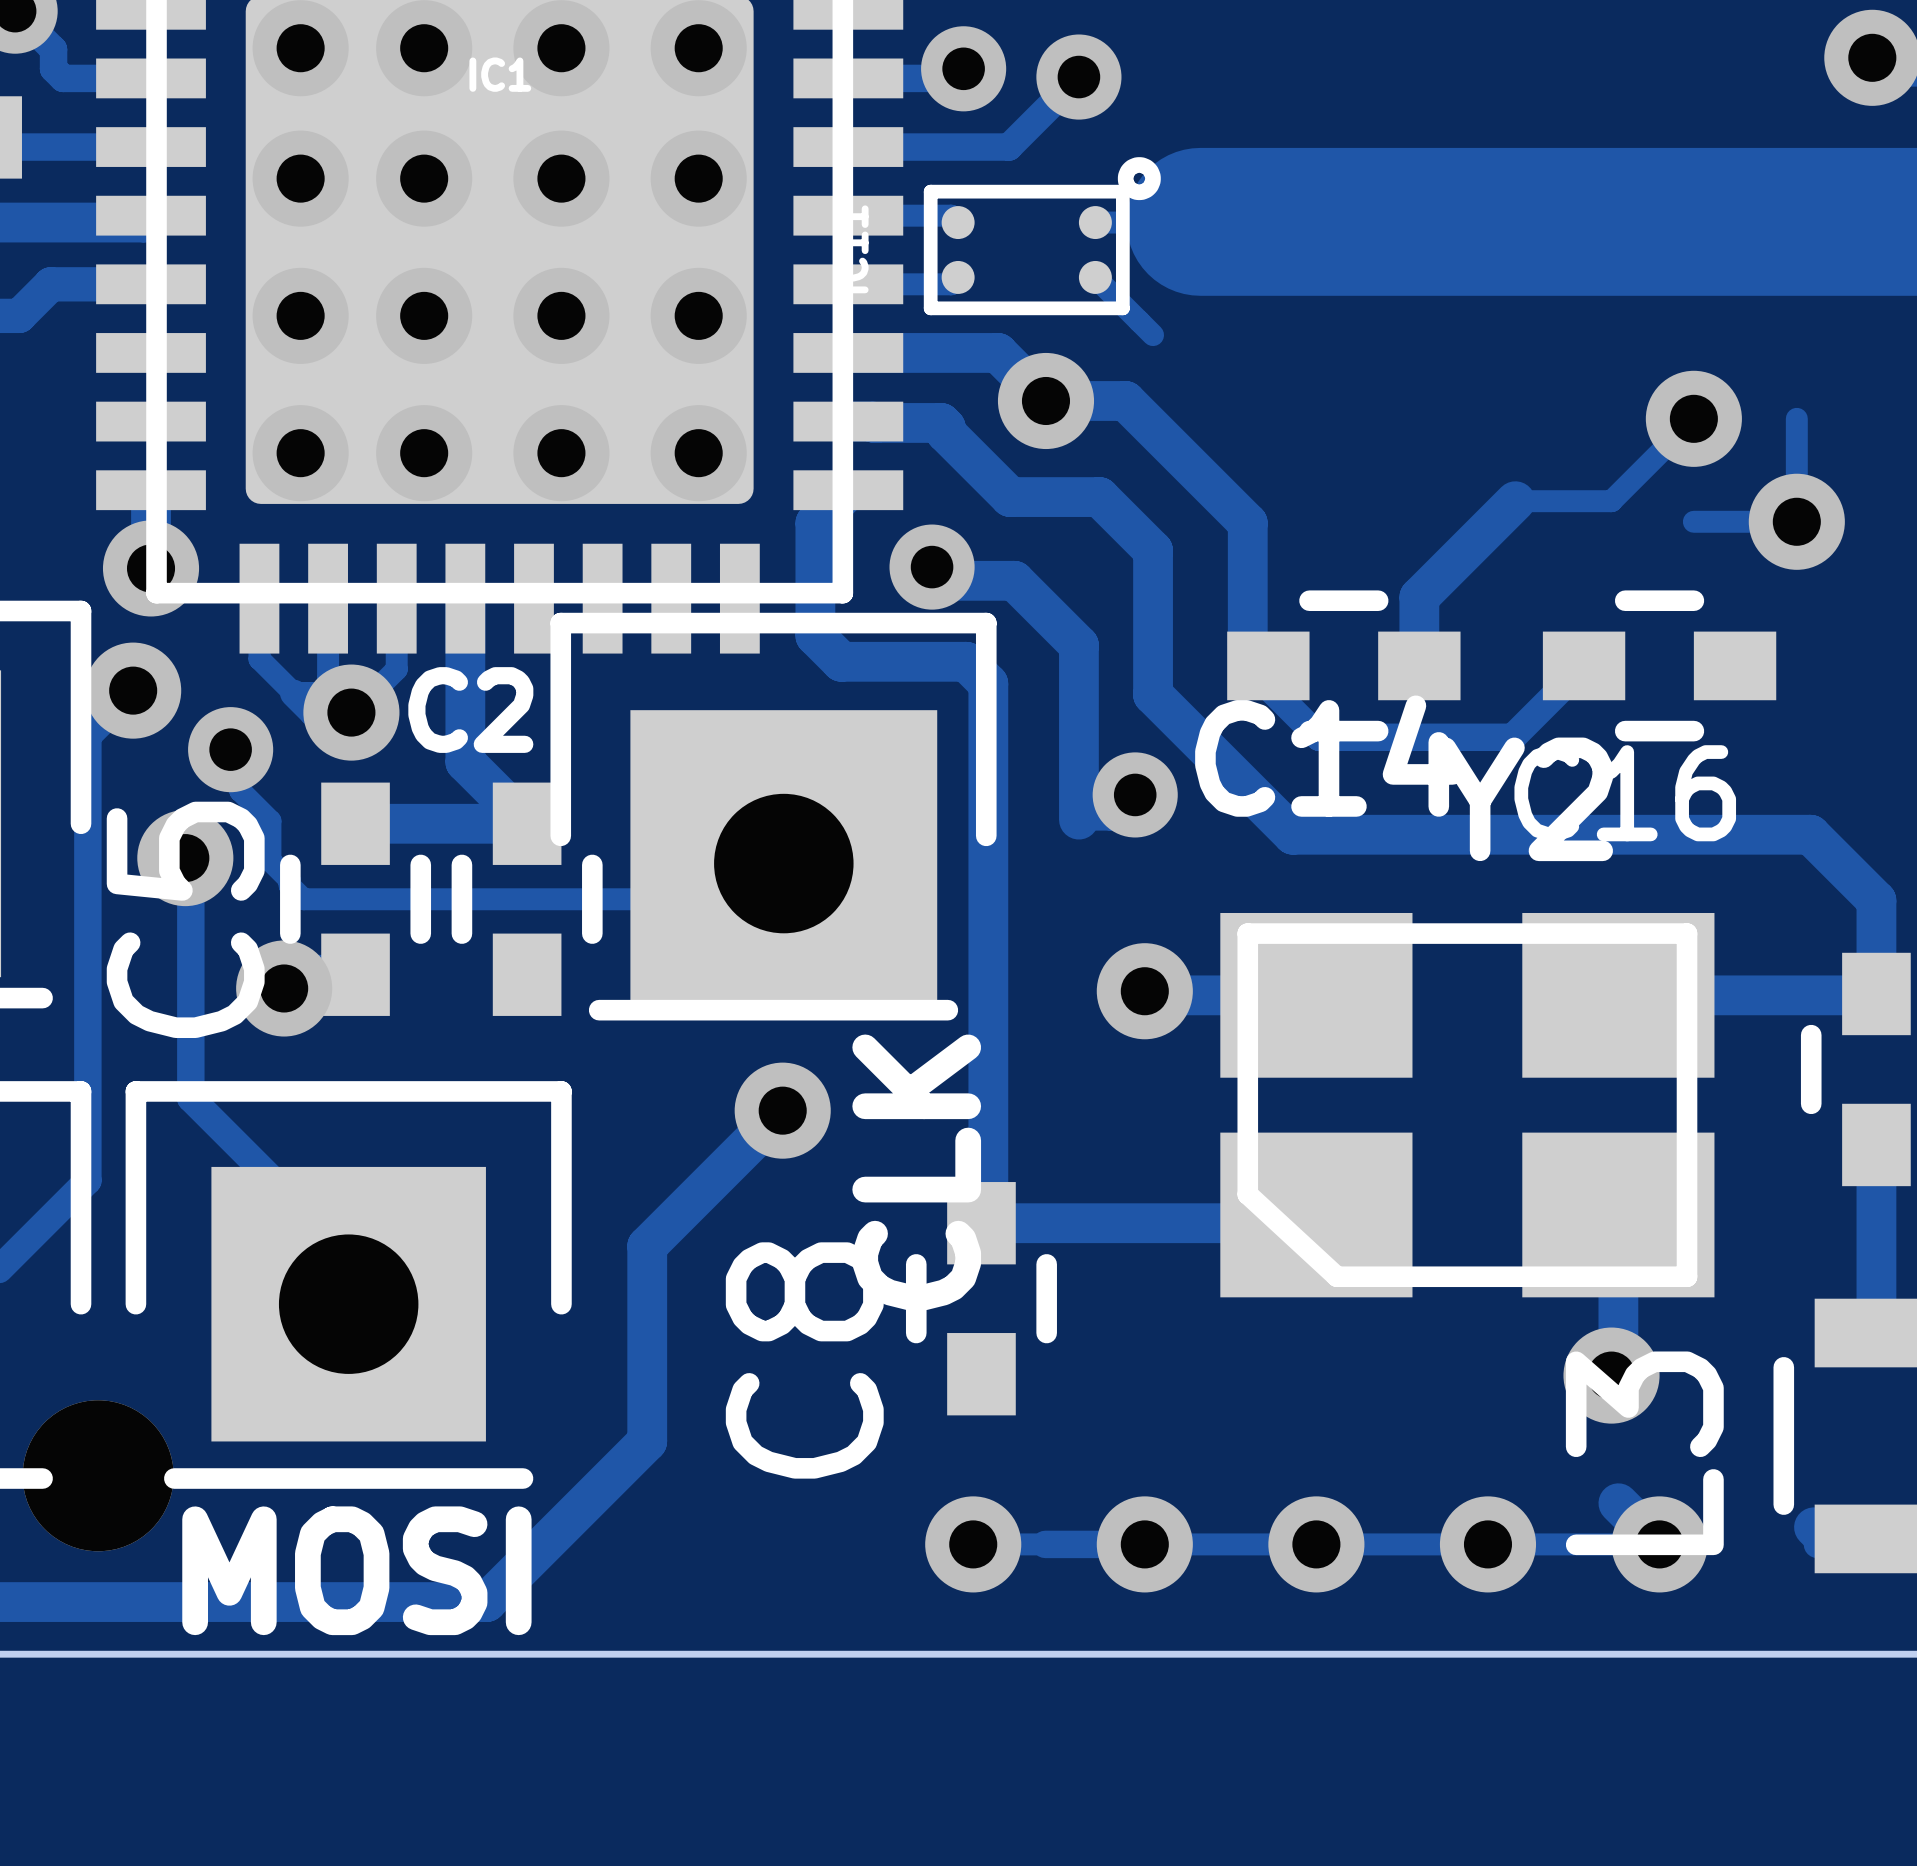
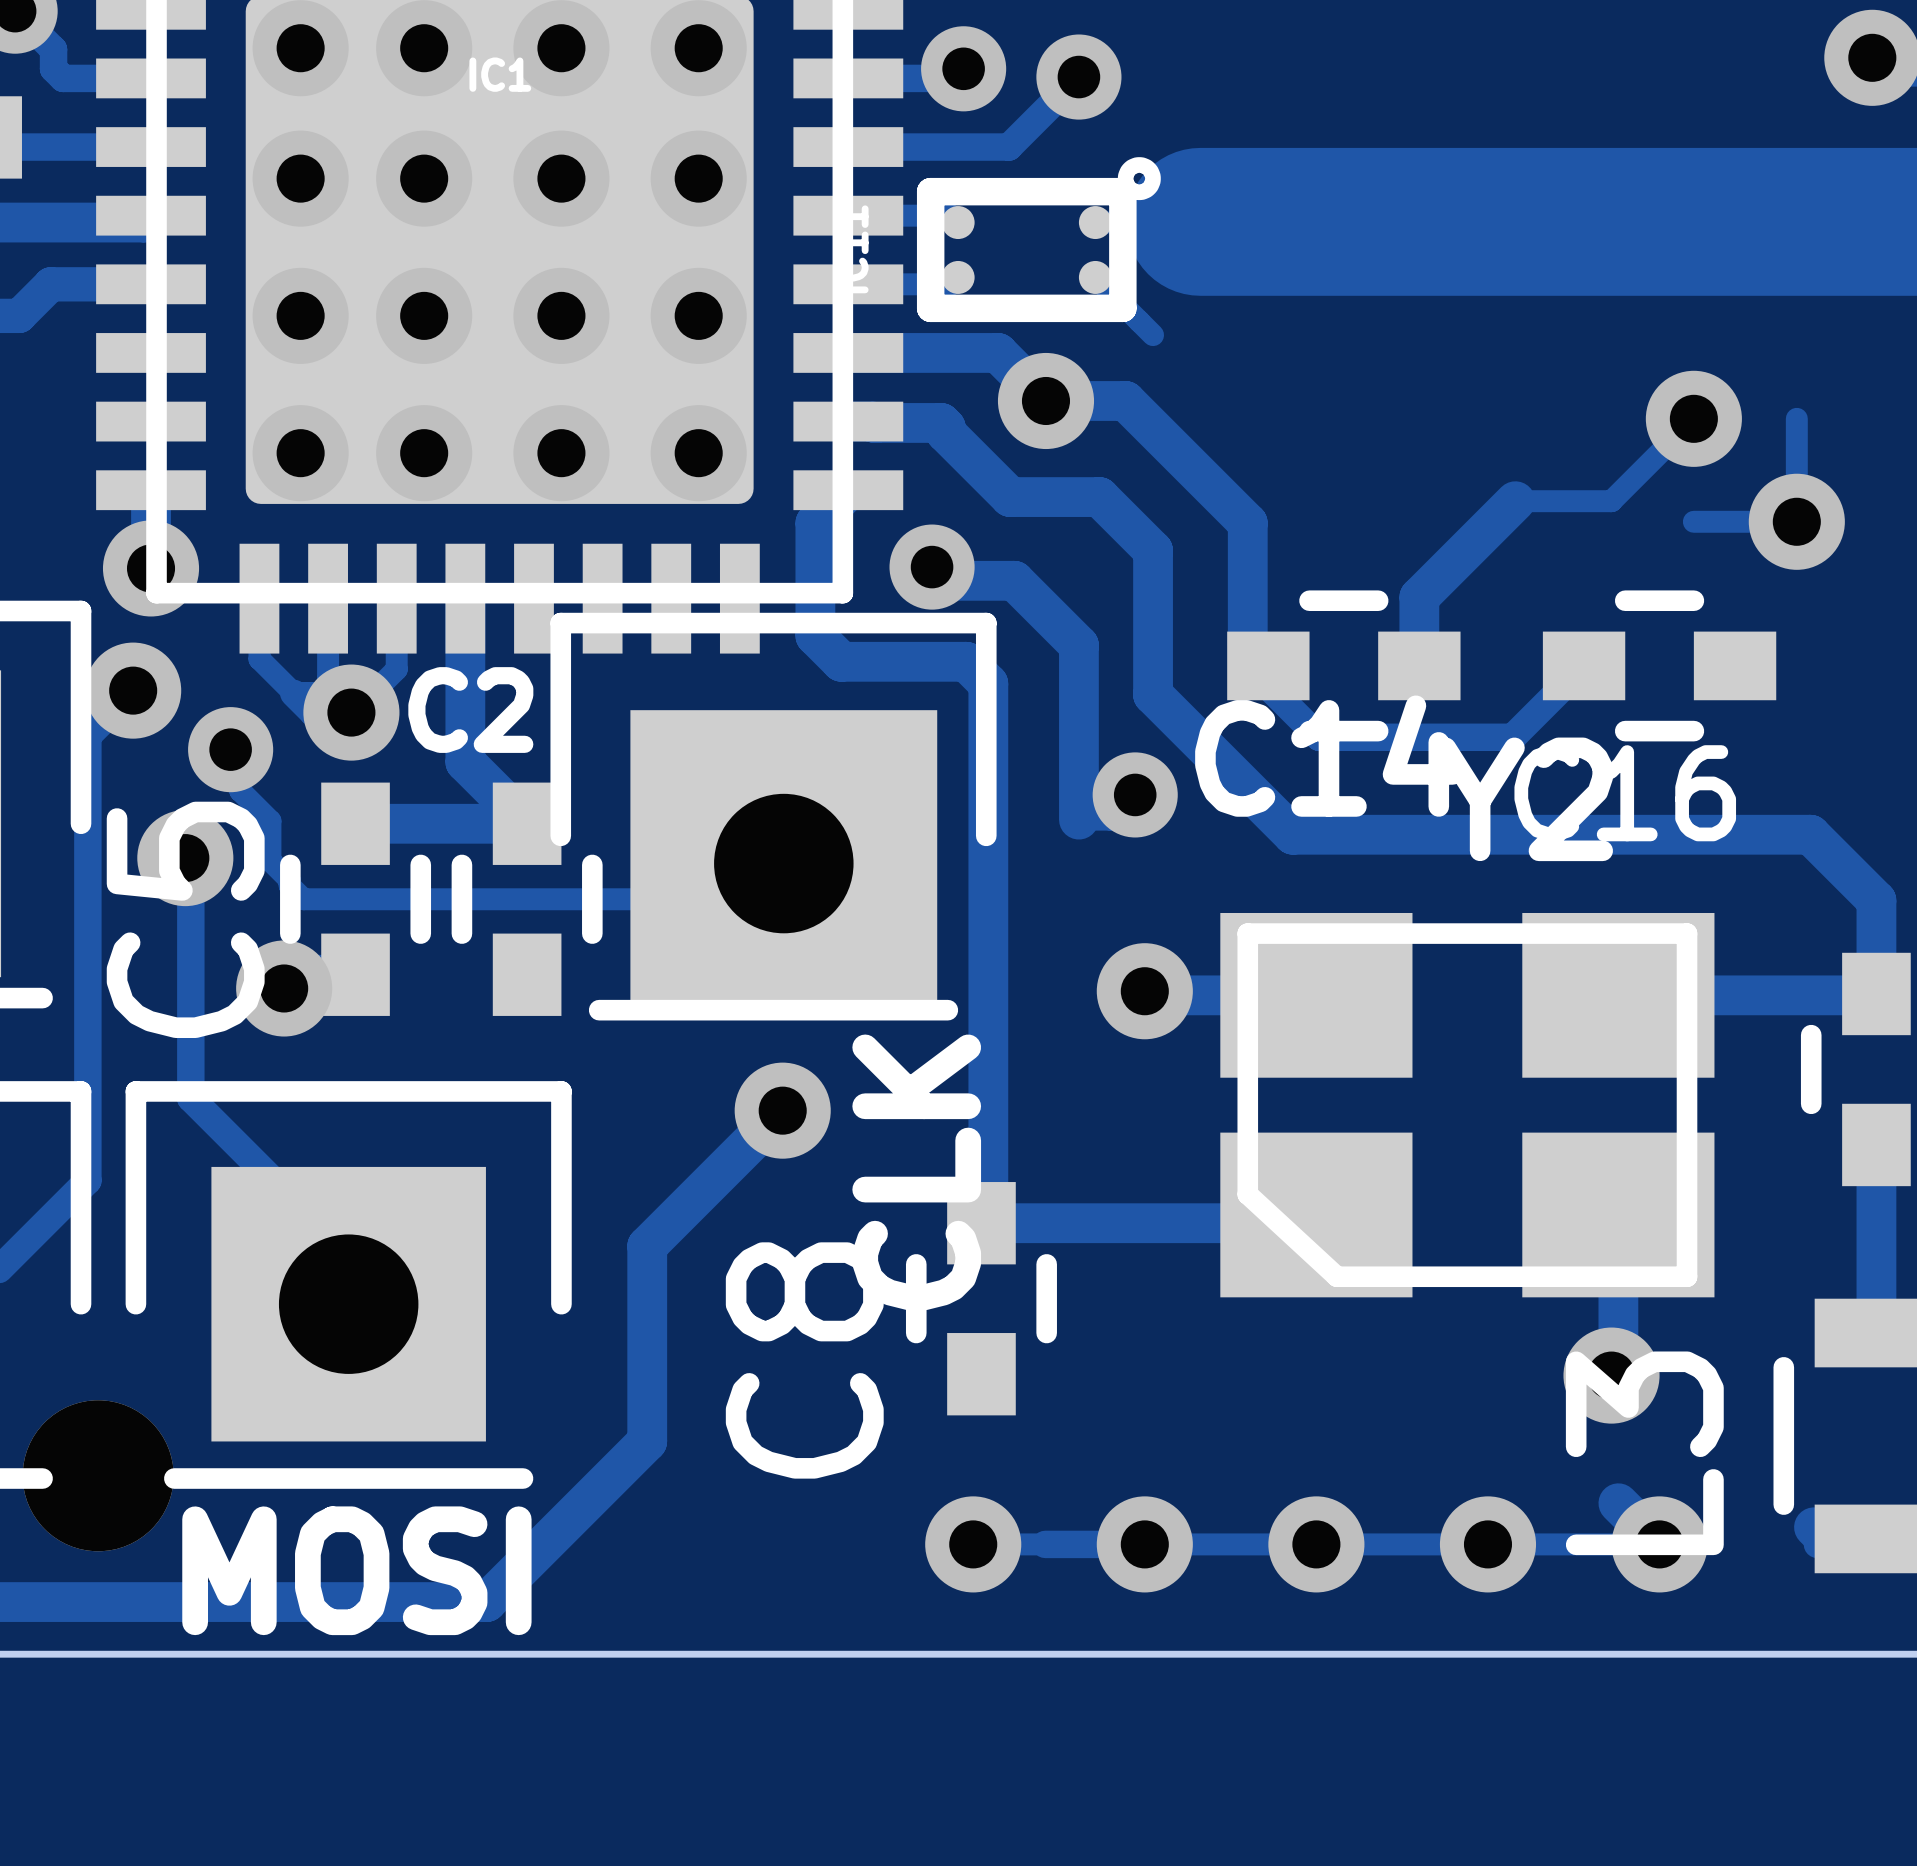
part footprint: [923, 157, 1161, 316] -> [916, 157, 1161, 323]

